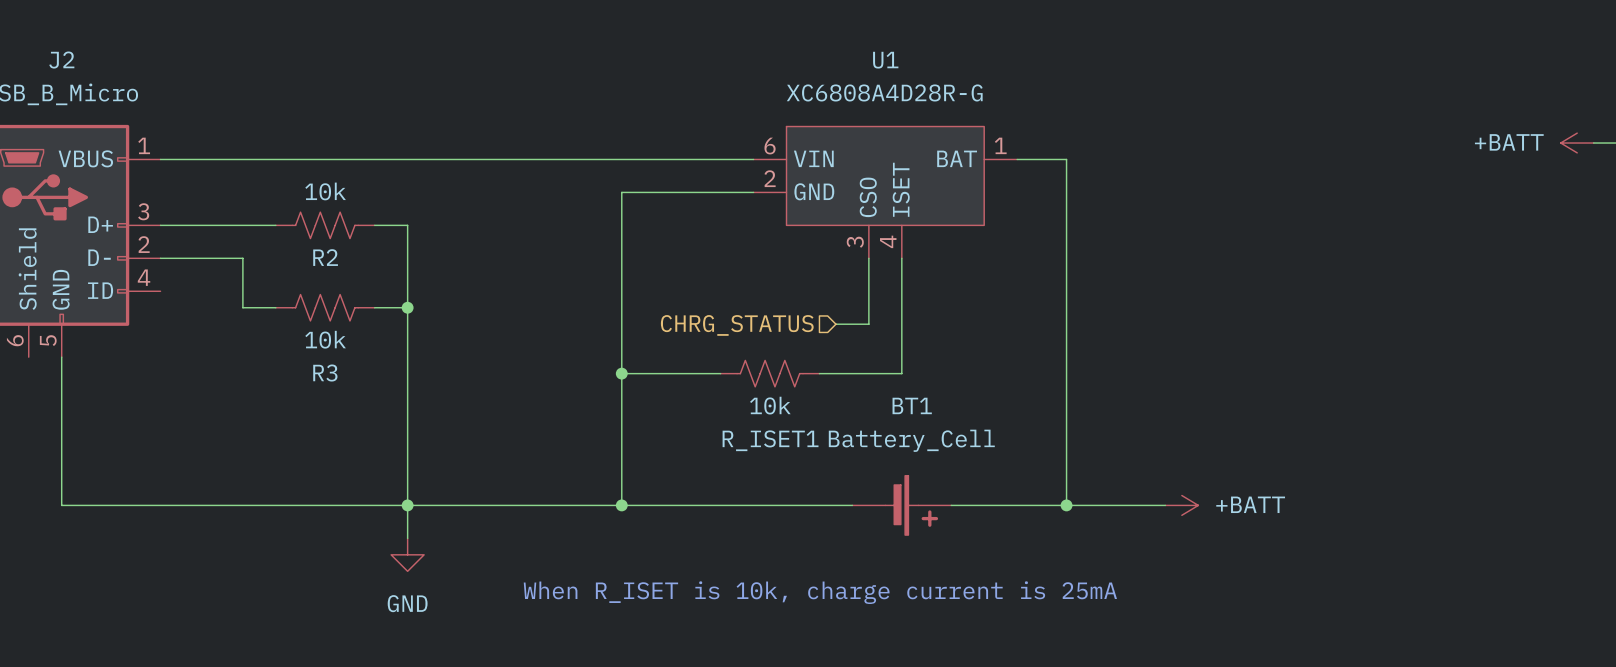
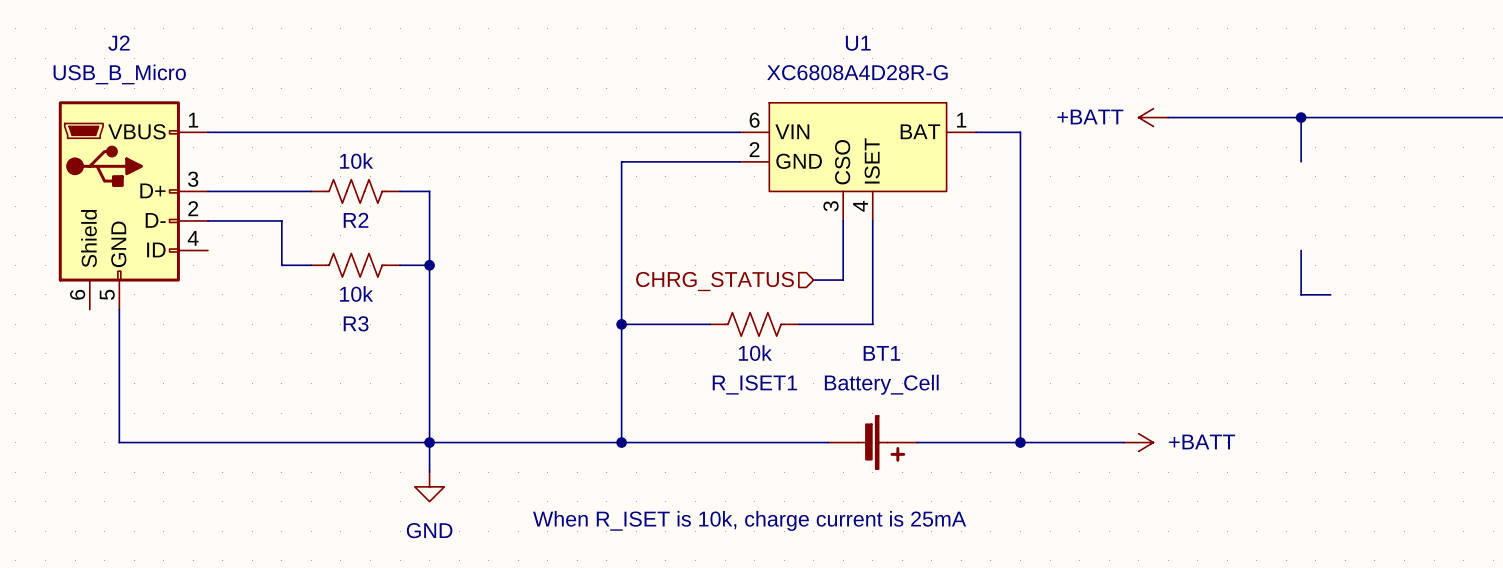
power symbol: none -> +BATT (1153, 117)
wire: none -> (1168, 117) (1493, 117)
wire: none -> (1301, 117) (1301, 161)
junction: none -> (1301, 117)
power symbol: +BATT (1577, 143) -> none
wire: none -> (1301, 250) (1301, 294) (1330, 294)
power symbol position: +BATT (1181, 505) -> +BATT (1138, 442)

